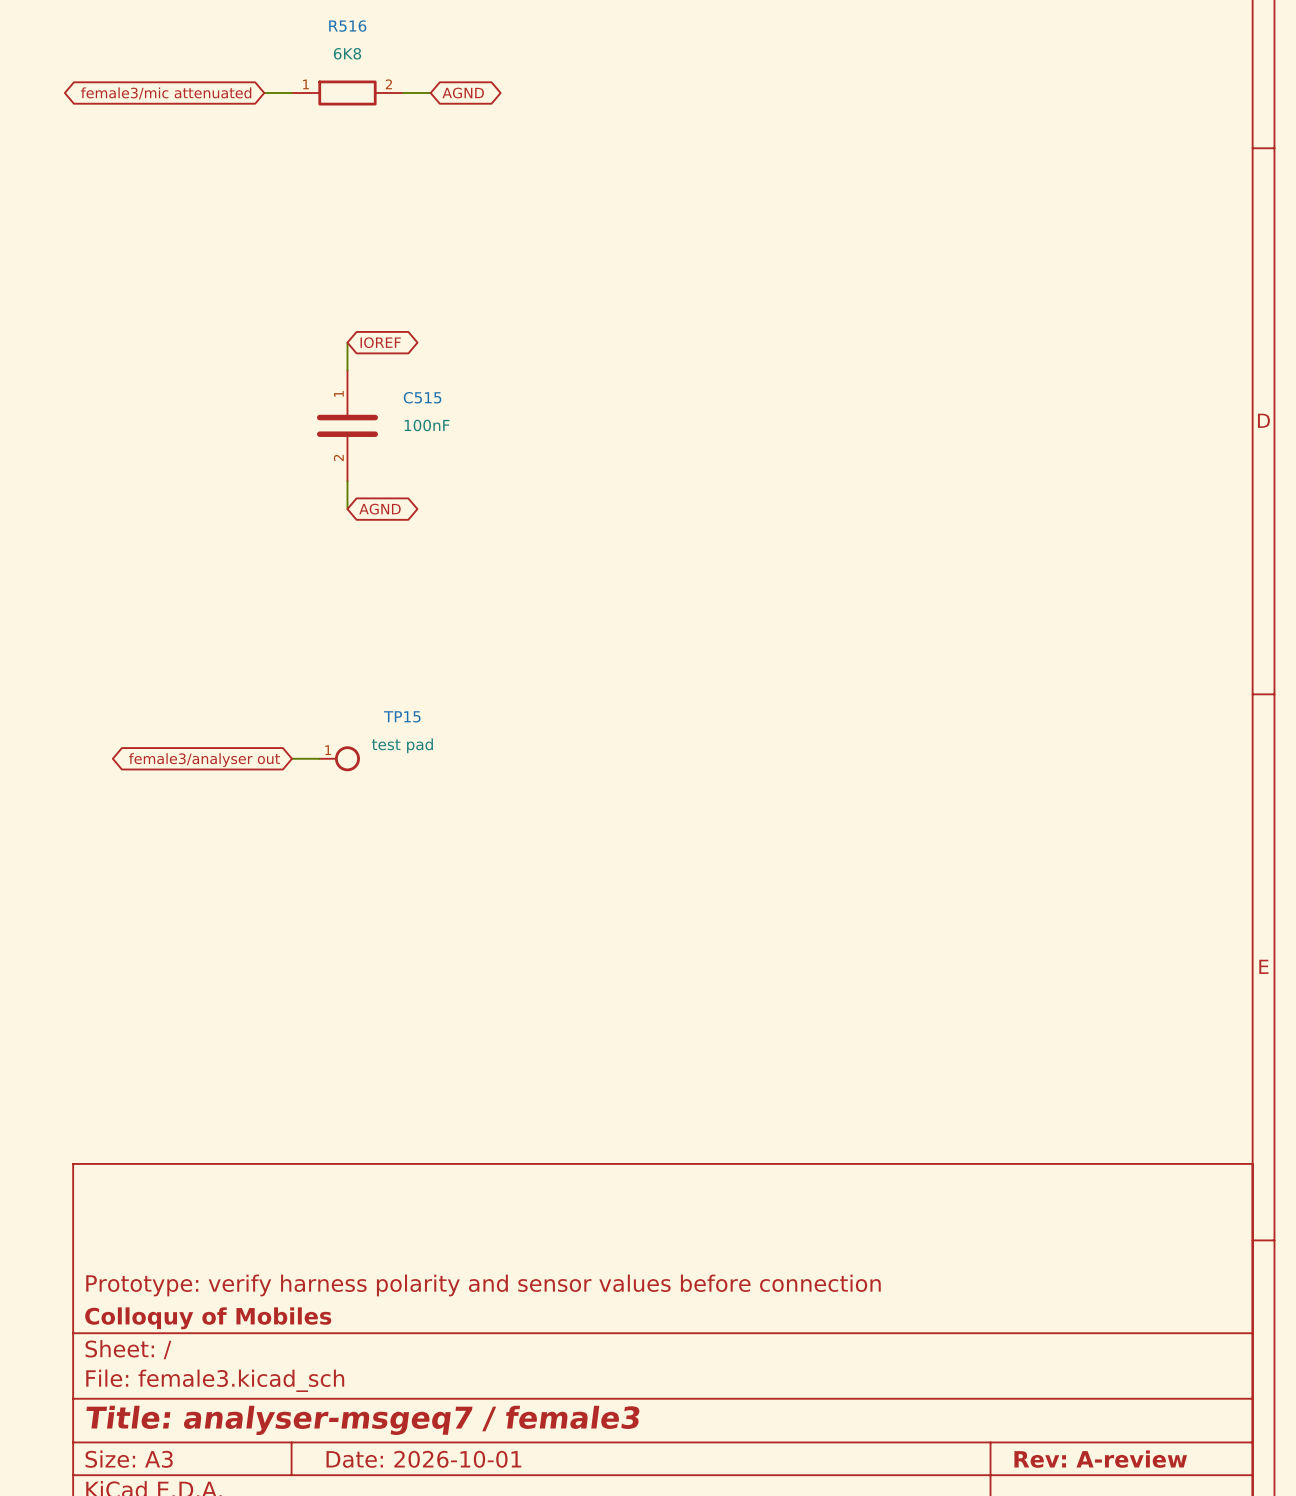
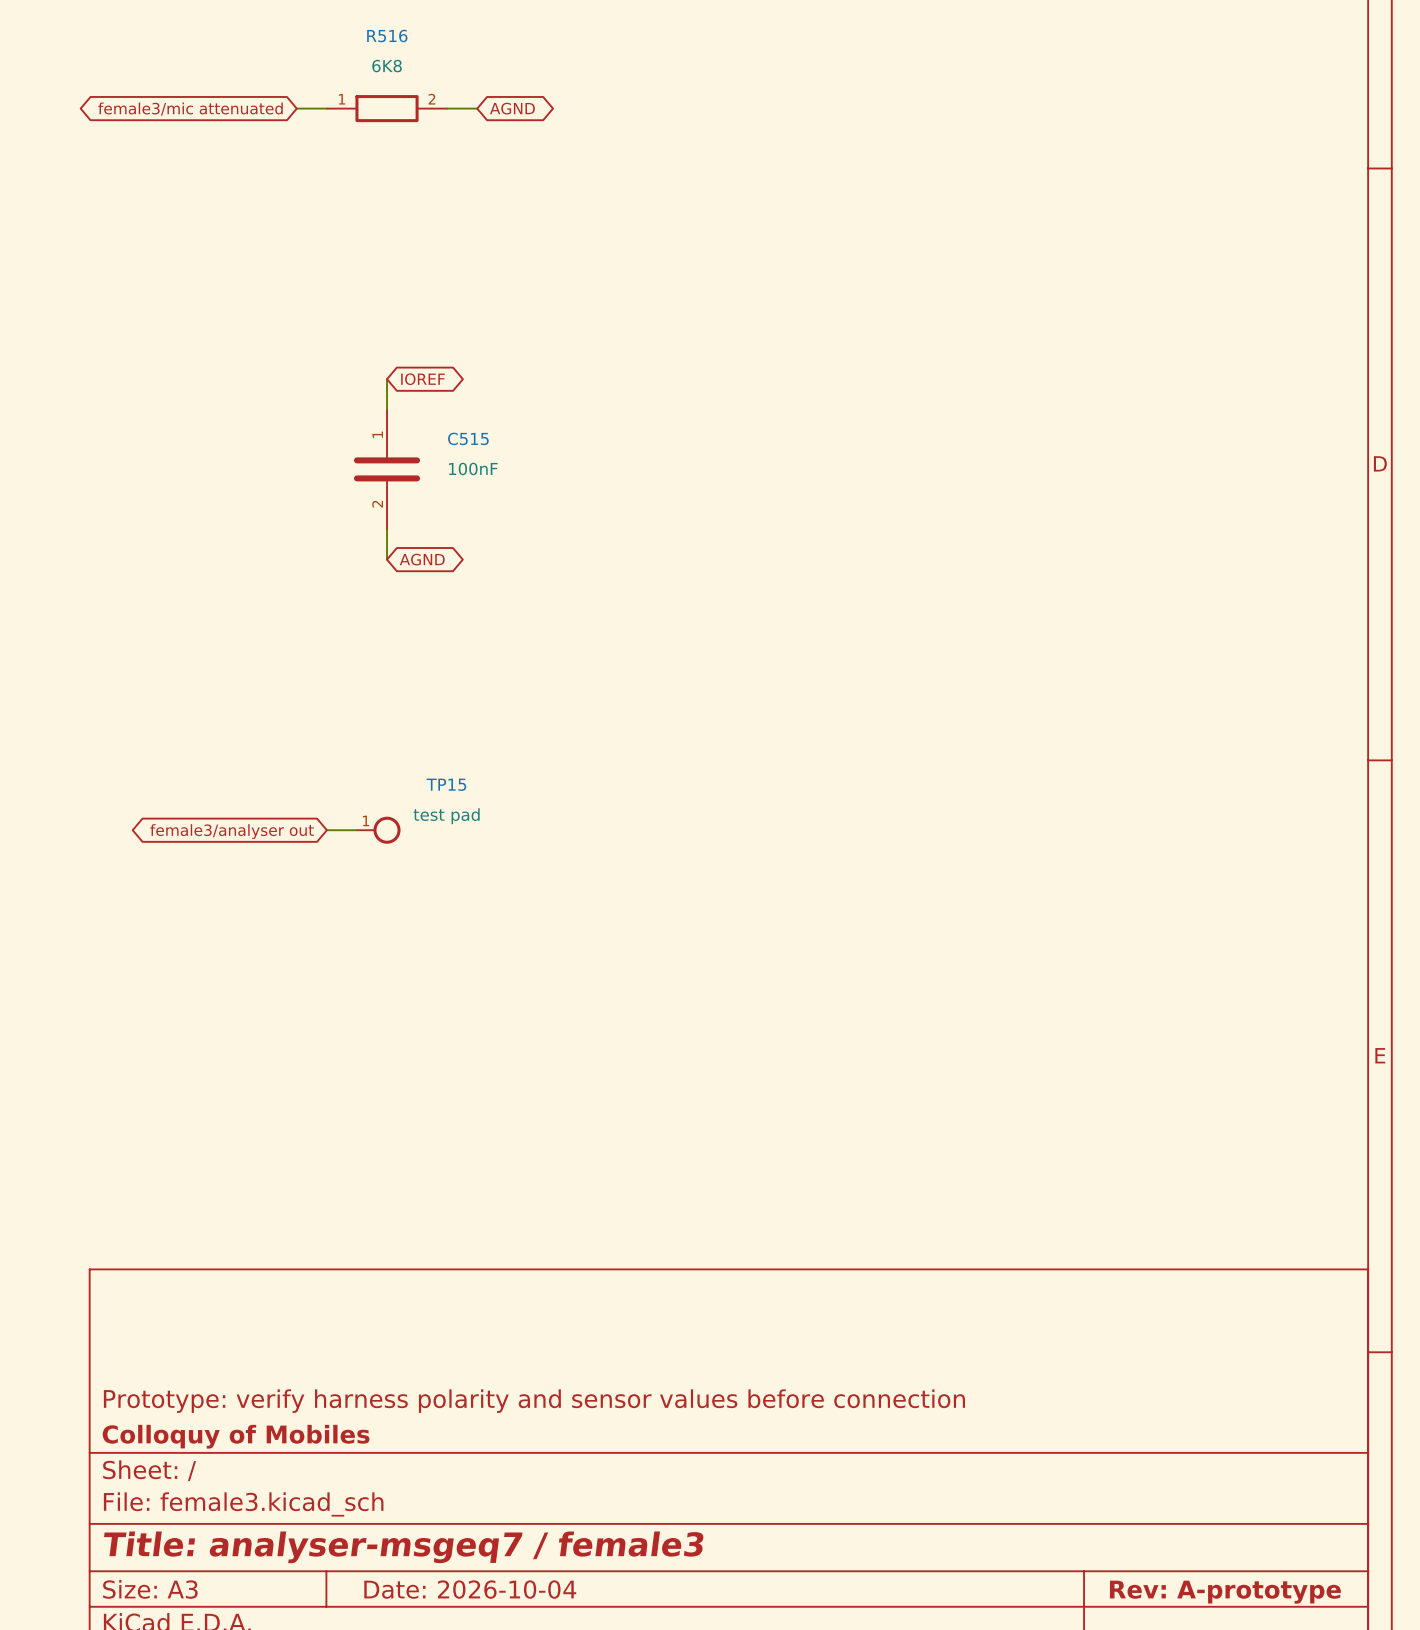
title block: Date: 2026-10-01 (423, 1459) -> Date: 2026-10-04 (470, 1589)
title block: Rev: A-review (1100, 1459) -> Rev: A-prototype (1225, 1592)

